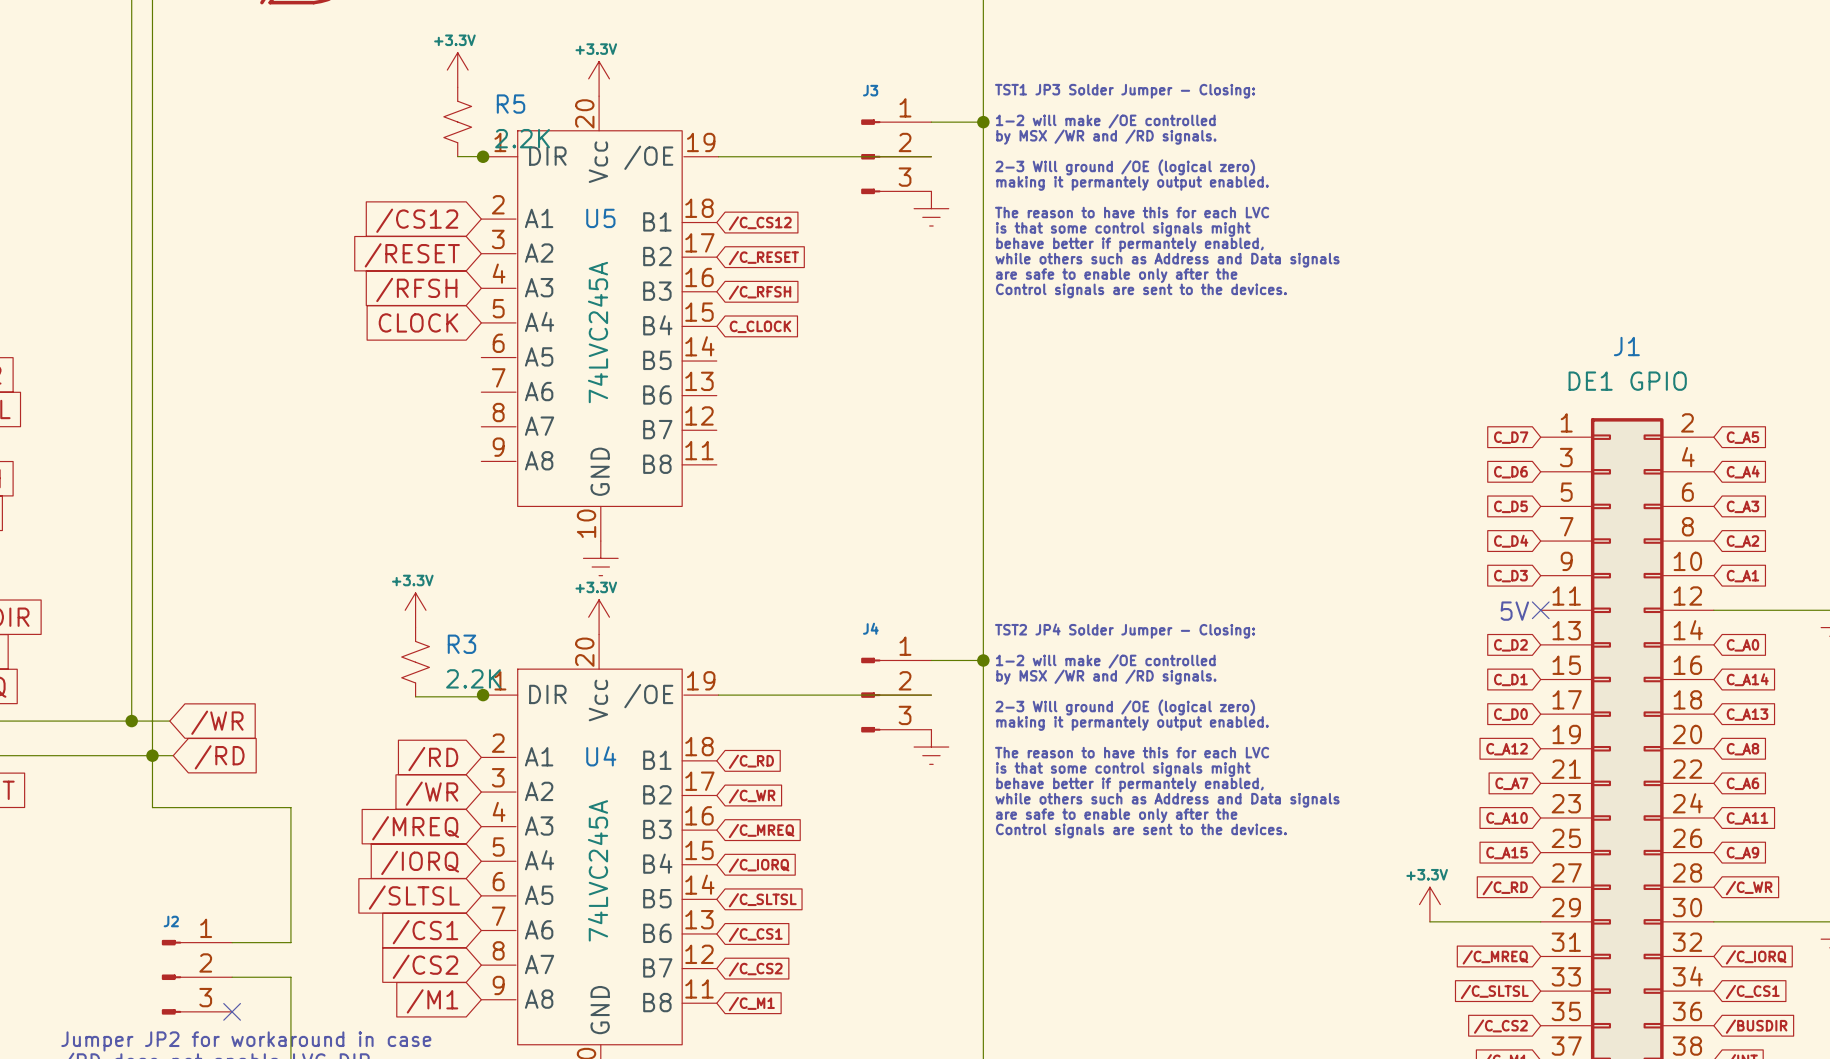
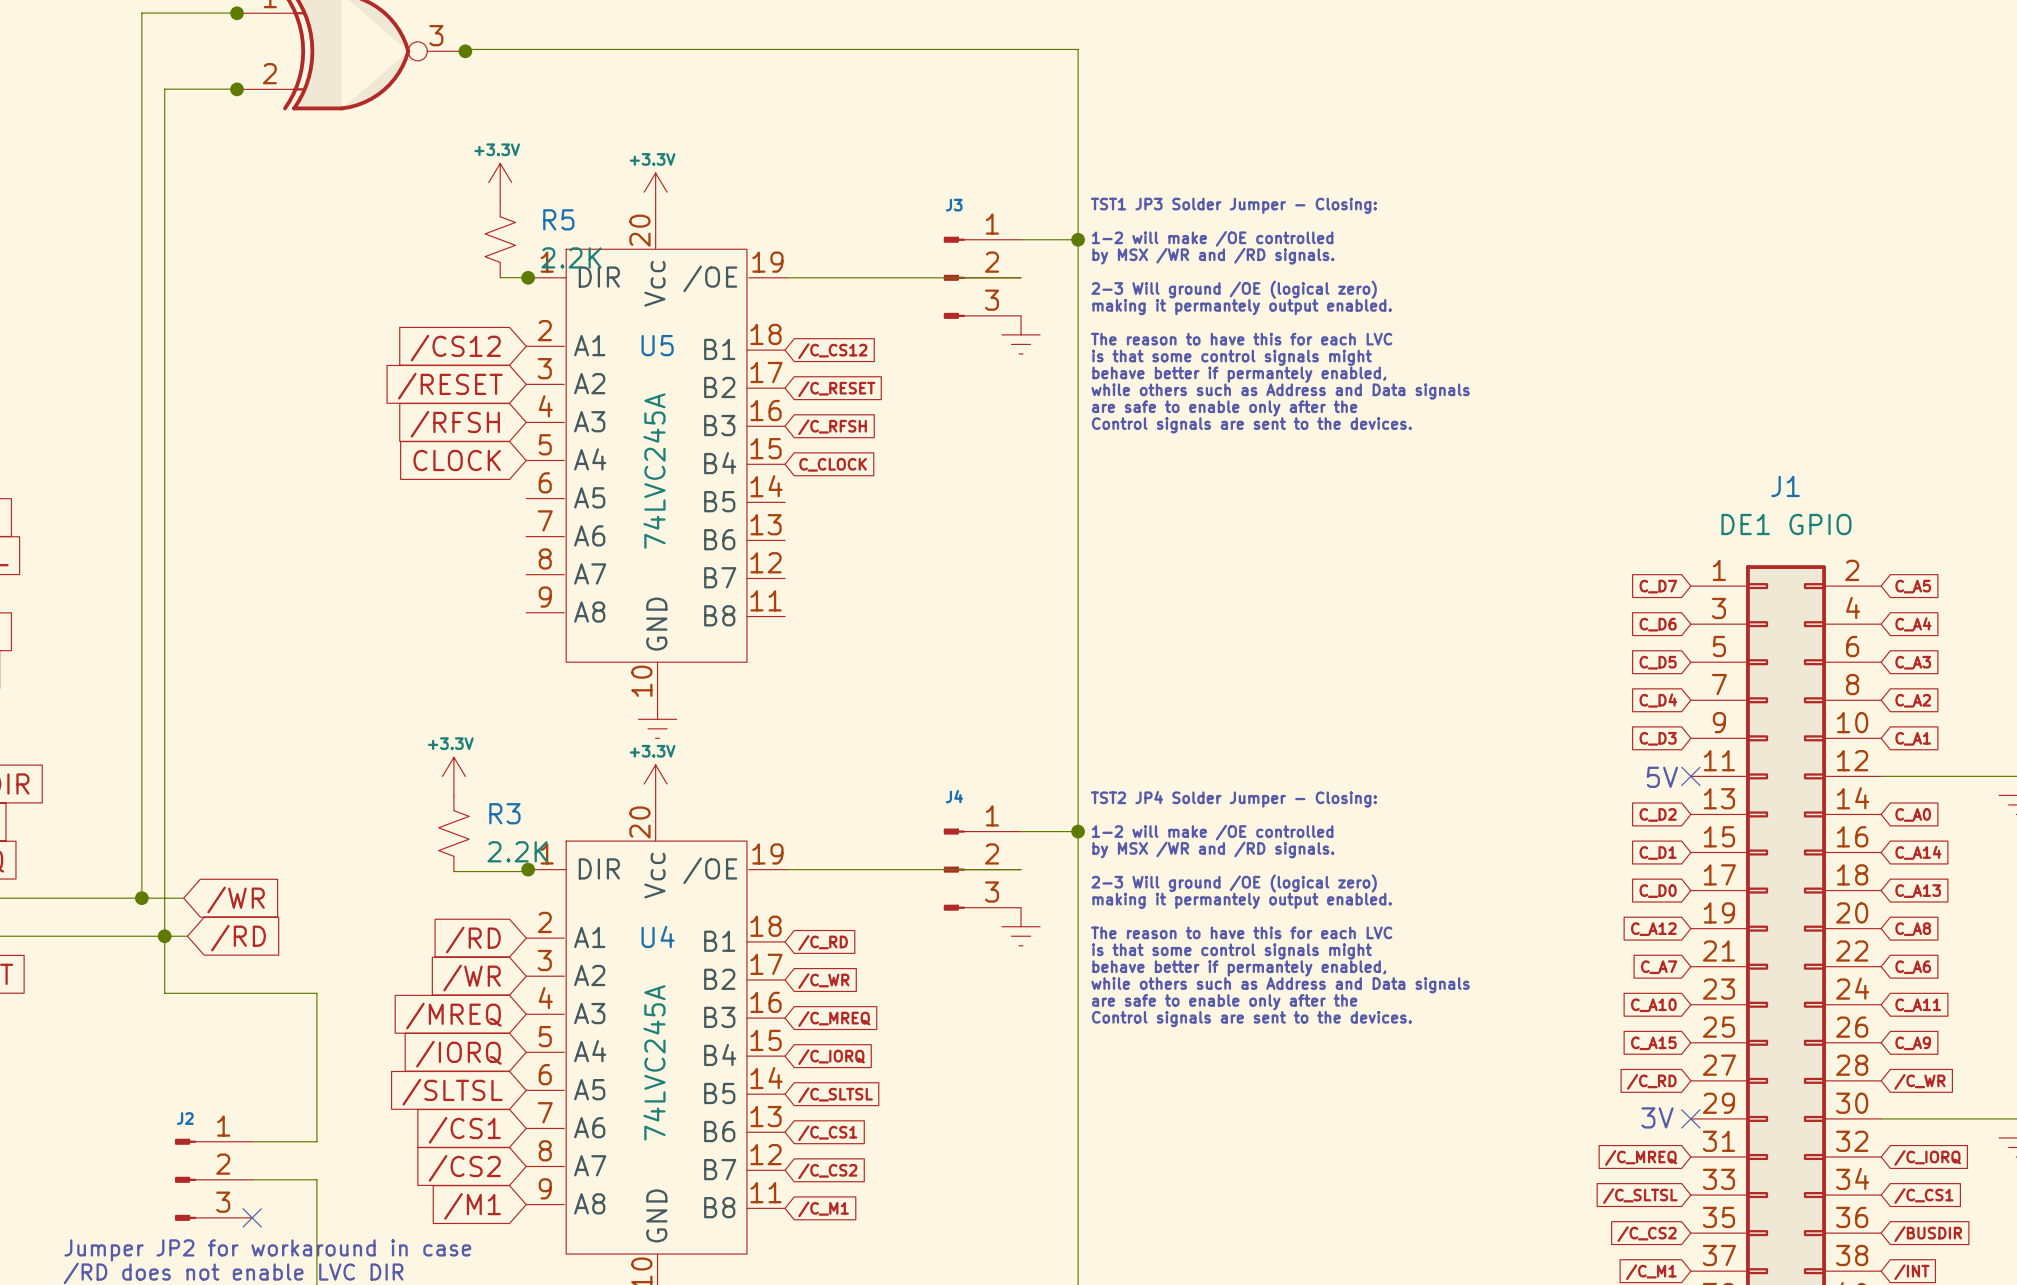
power symbol: +3.3V (1429, 904) -> none
text: none -> 3V (1657, 1117)
wire: (1429, 921) (1540, 921) -> none
no-connect mark: none -> (1690, 1118)

